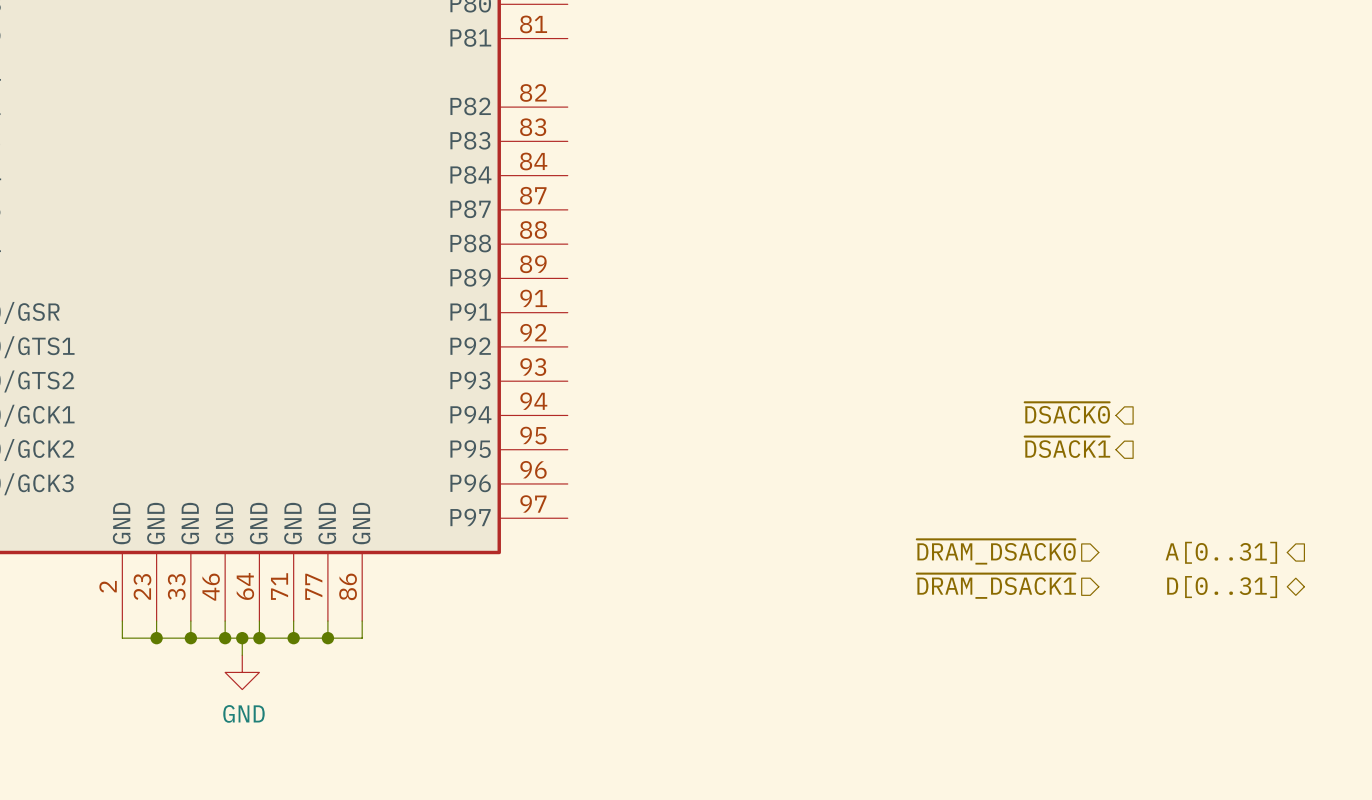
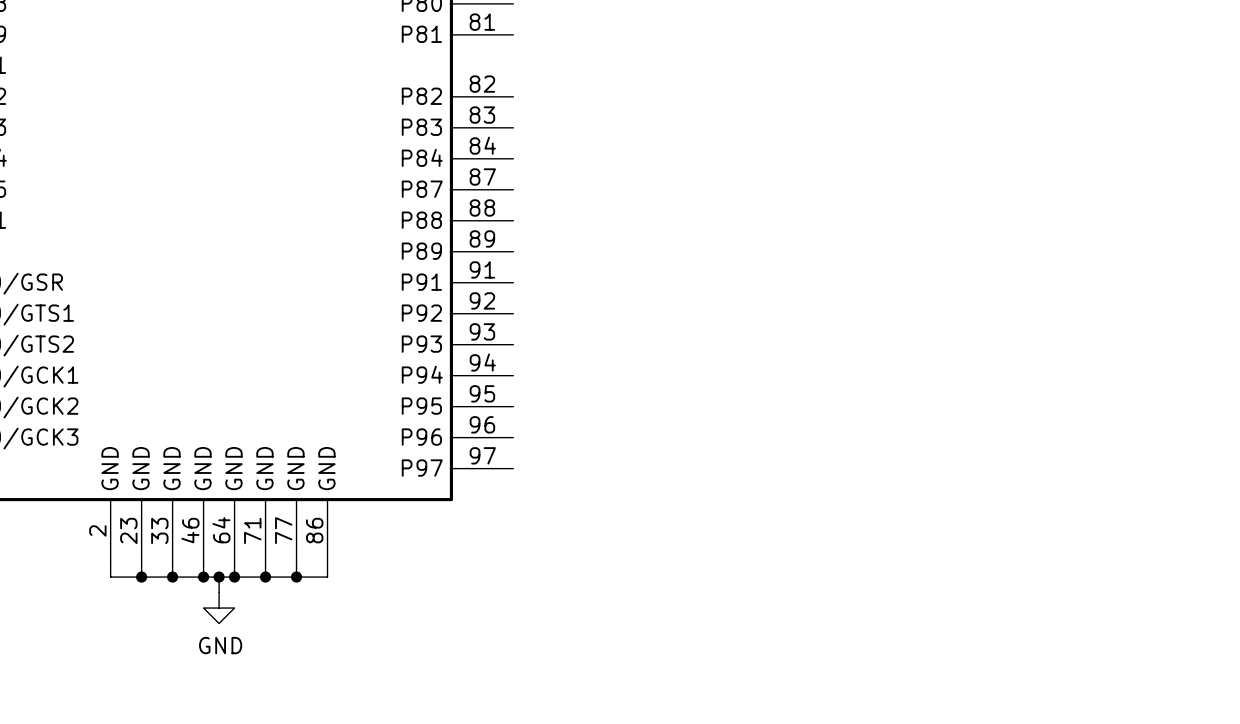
hierarchical label: ~{DSACK0} (1067, 412) -> none
hierarchical label: ~{DSACK1} (1067, 447) -> none
hierarchical label: ~{DRAM_DSACK0} (996, 551) -> none
hierarchical label: A[0..31] (1221, 552) -> none
hierarchical label: ~{DRAM_DSACK1} (996, 586) -> none
hierarchical label: D[0..31] (1222, 587) -> none

